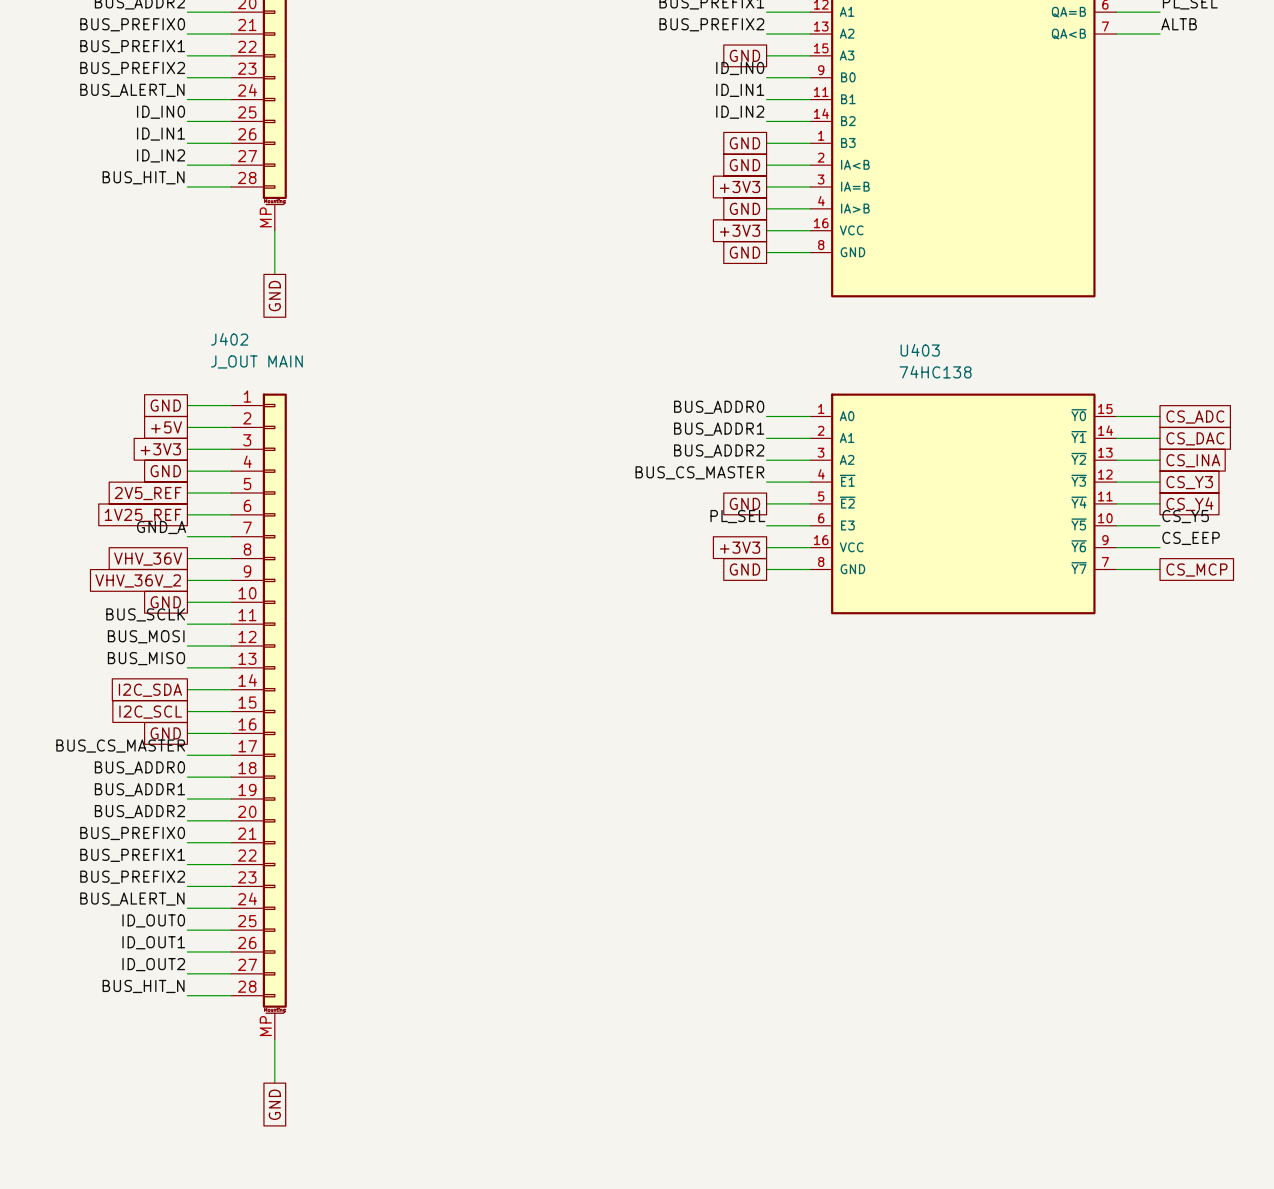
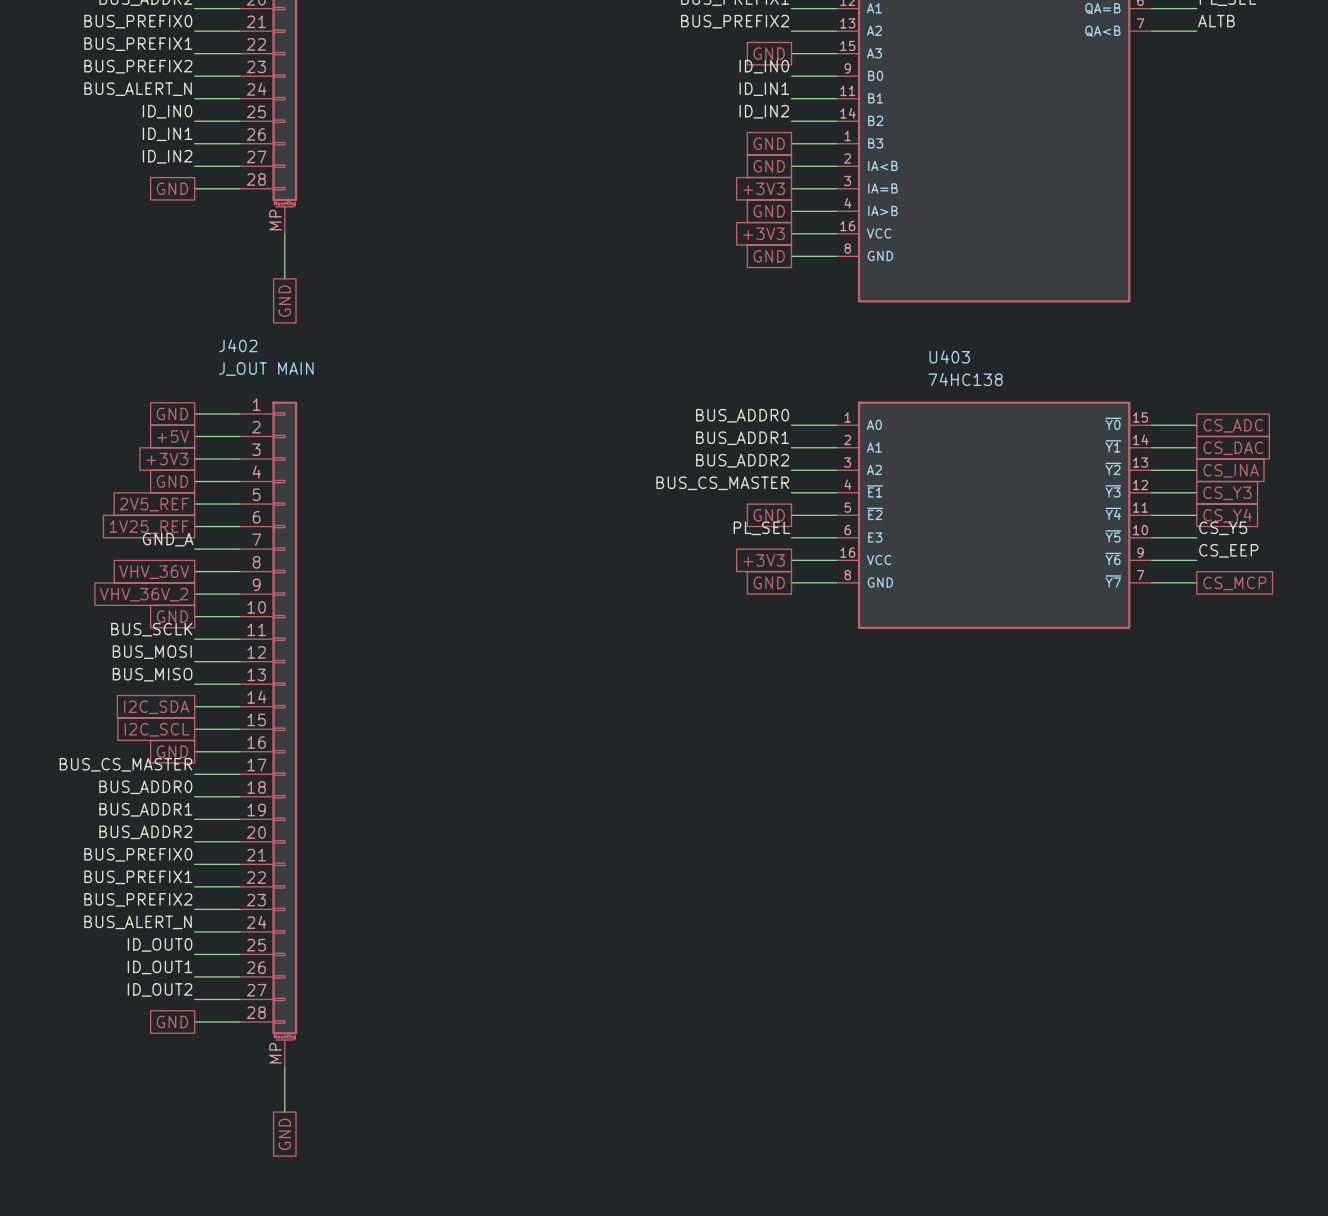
label: BUS_HIT_N (143, 177) -> none
global label: none -> GND (172, 188)
label: BUS_HIT_N (143, 986) -> none
global label: none -> GND (172, 1021)

